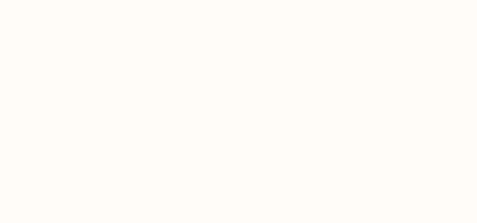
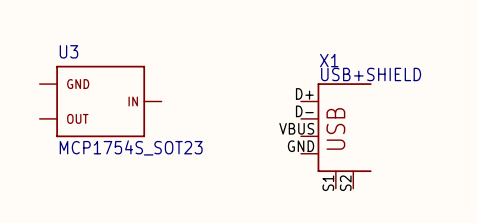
U3: none -> MCP1754S_SOT23 (100, 101)
X1: none -> USB+SHIELD (336, 135)

